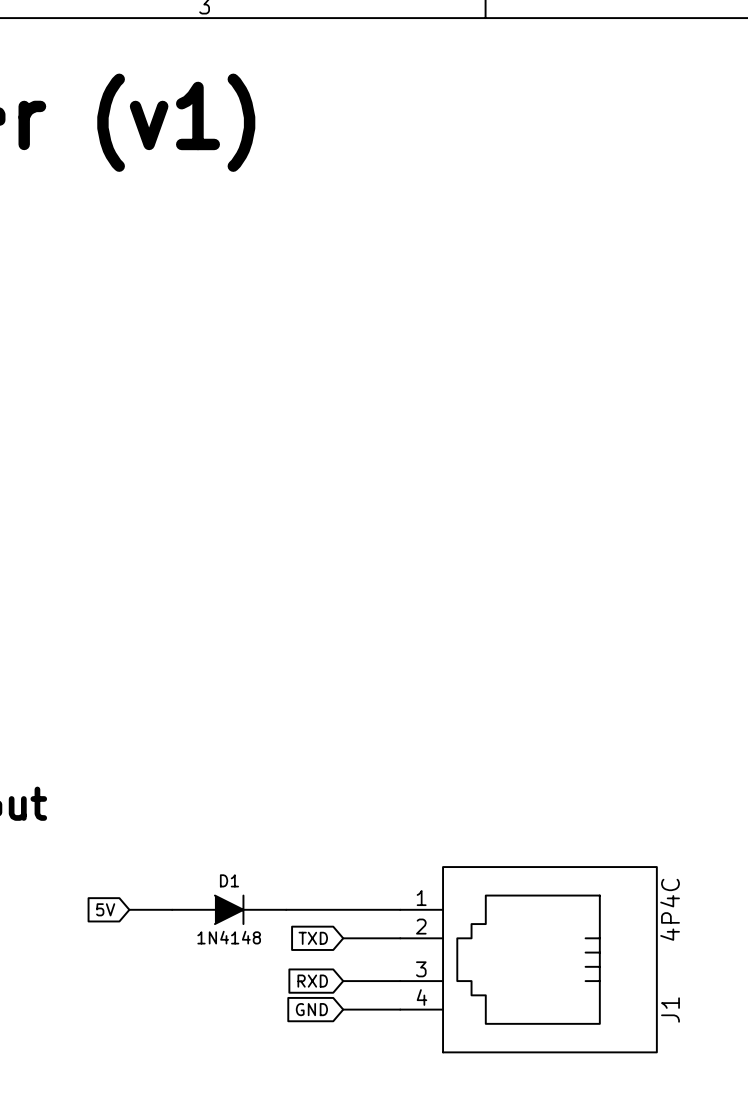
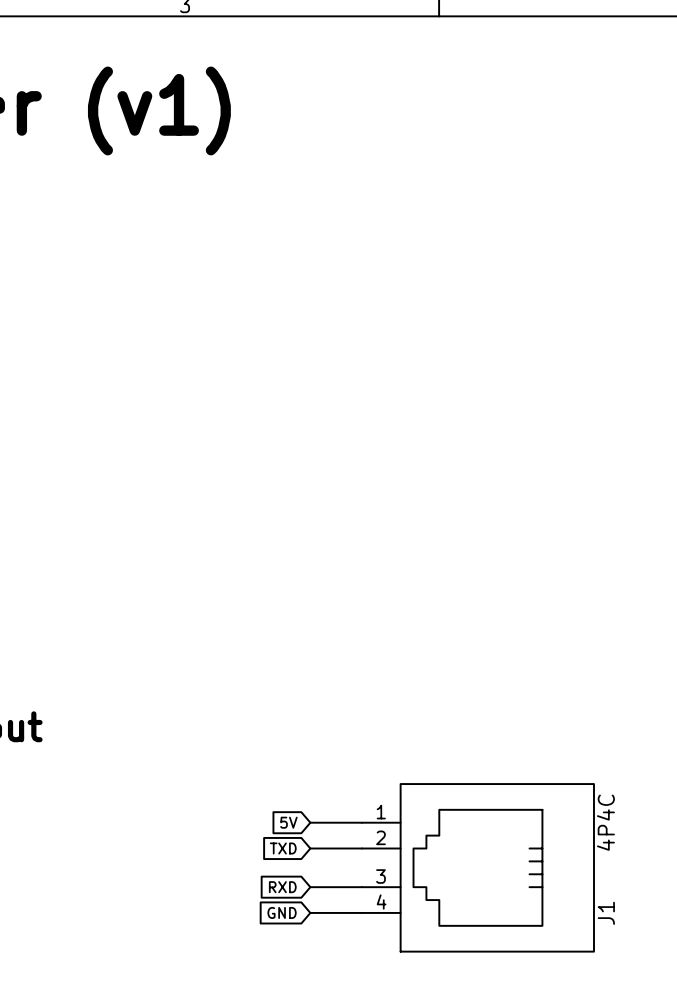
global label position: 5V (105, 909) -> 5V (288, 822)
wire: (129, 909) (172, 909) -> none
D1: 1N4148 (229, 909) -> none
wire: (286, 909) (343, 909) -> none

